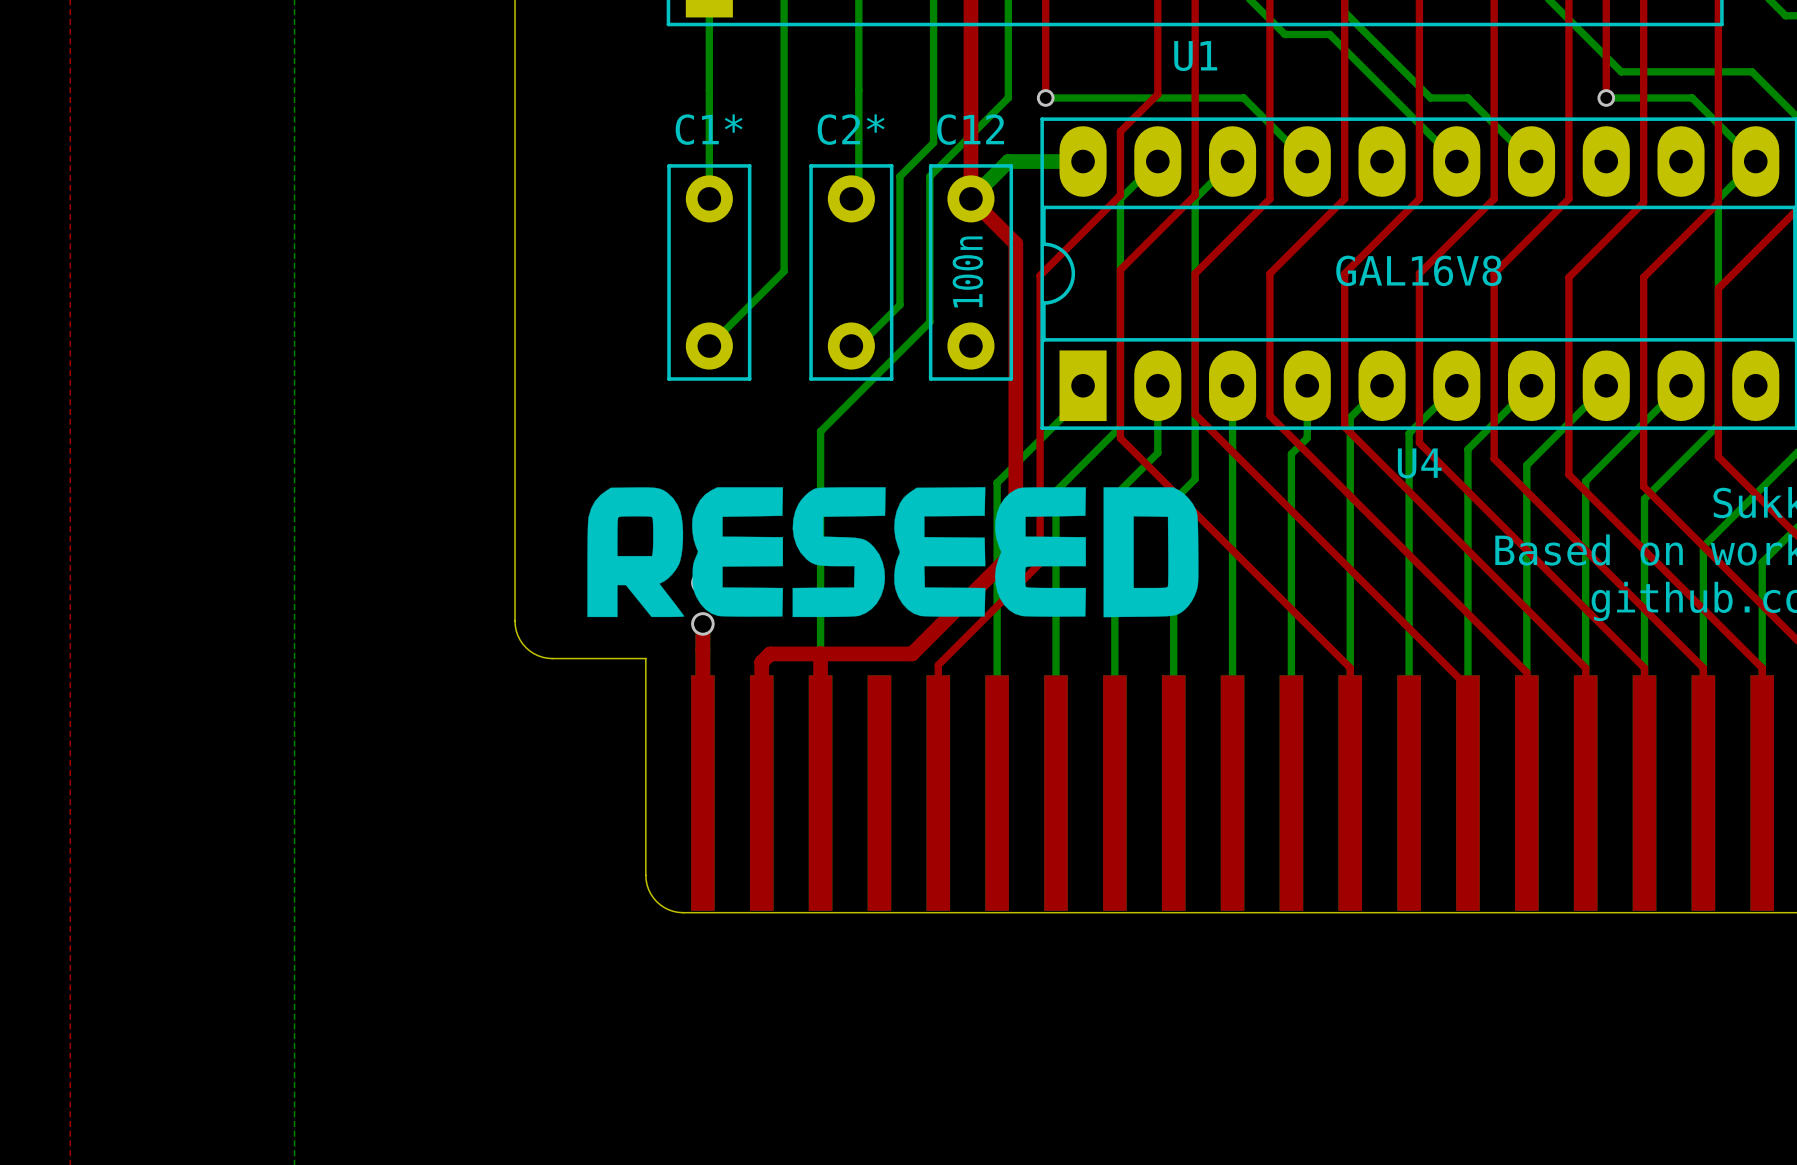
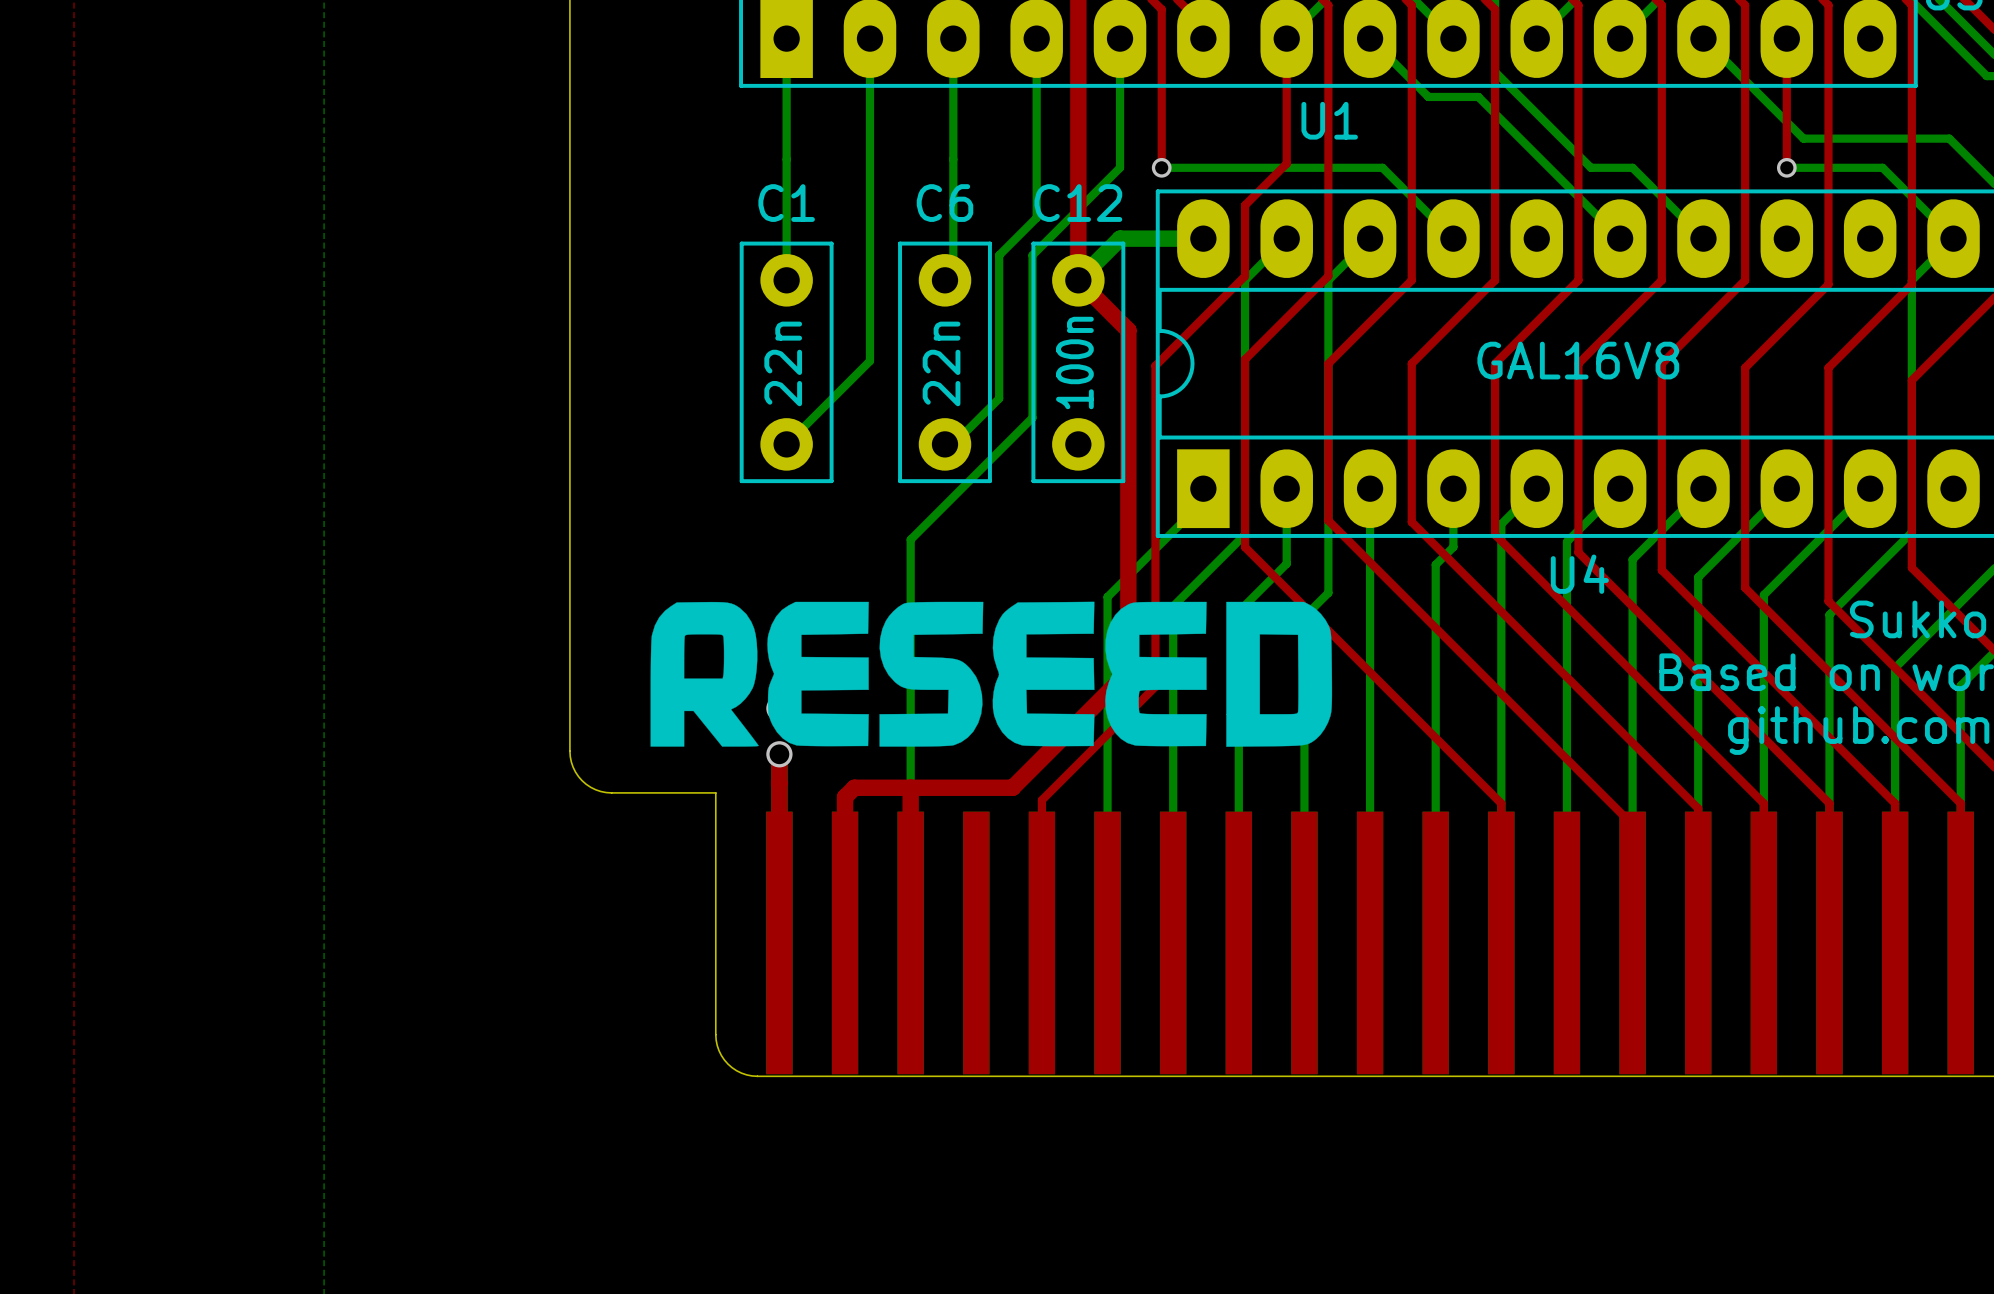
C1 name: none -> C1 (786, 203)
text: C1* (709, 129) -> none
C6 name: none -> C6 (945, 203)
text: C2* (851, 129) -> none
C1 value: none -> 22n (783, 363)
C6 value: none -> 22n (941, 363)

